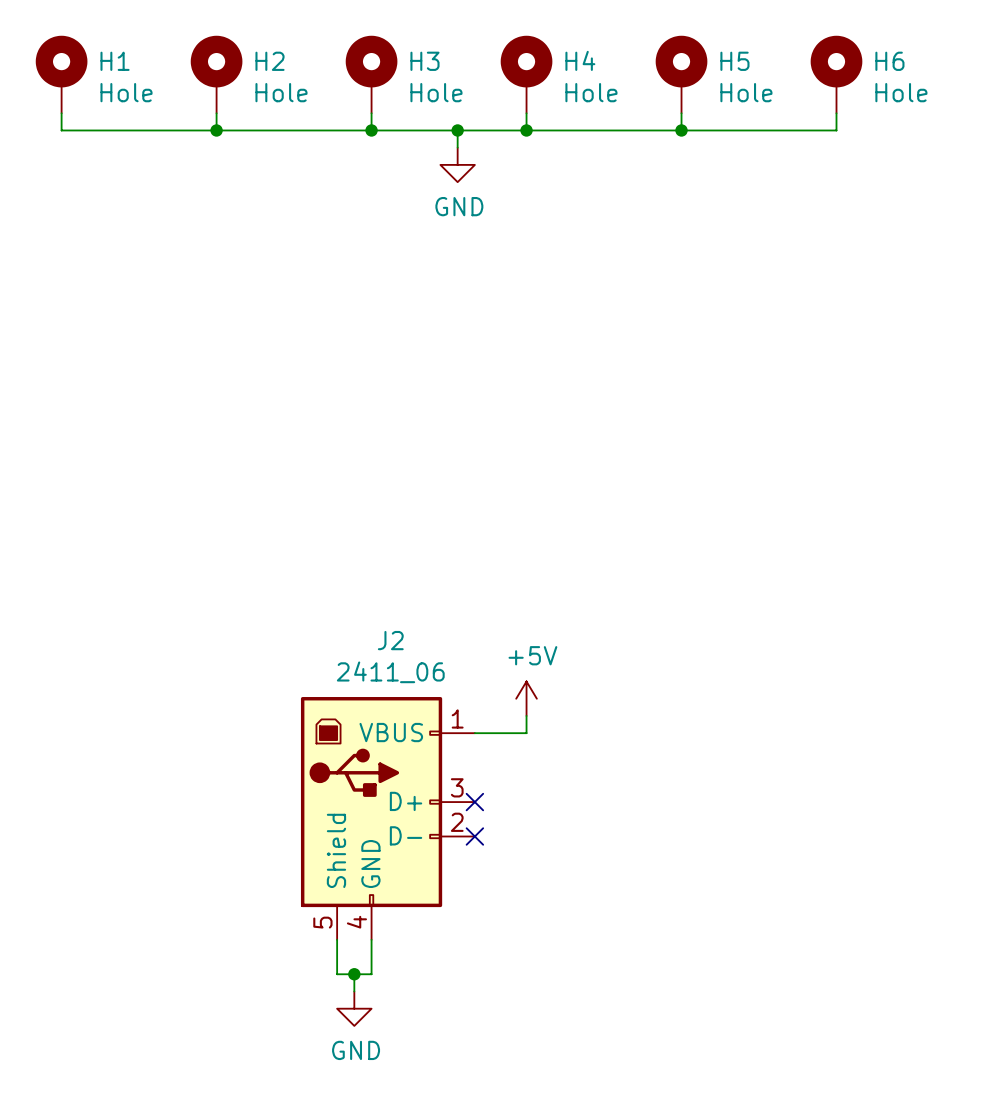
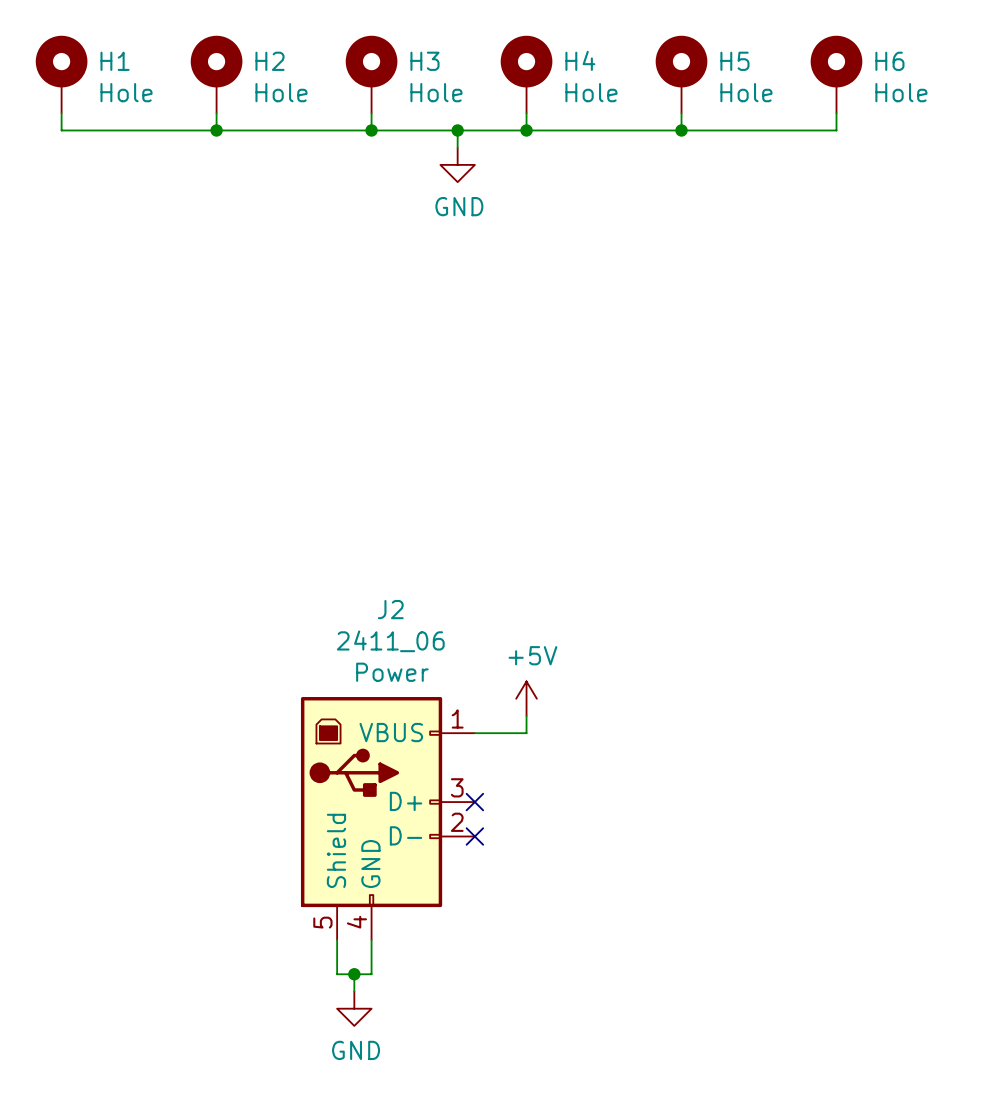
J2 name position: J2 (390, 640) -> J2 (390, 609)
J2 value position: 2411_06 (390, 672) -> 2411_06 (390, 641)
J2 text: none -> Power (392, 672)

